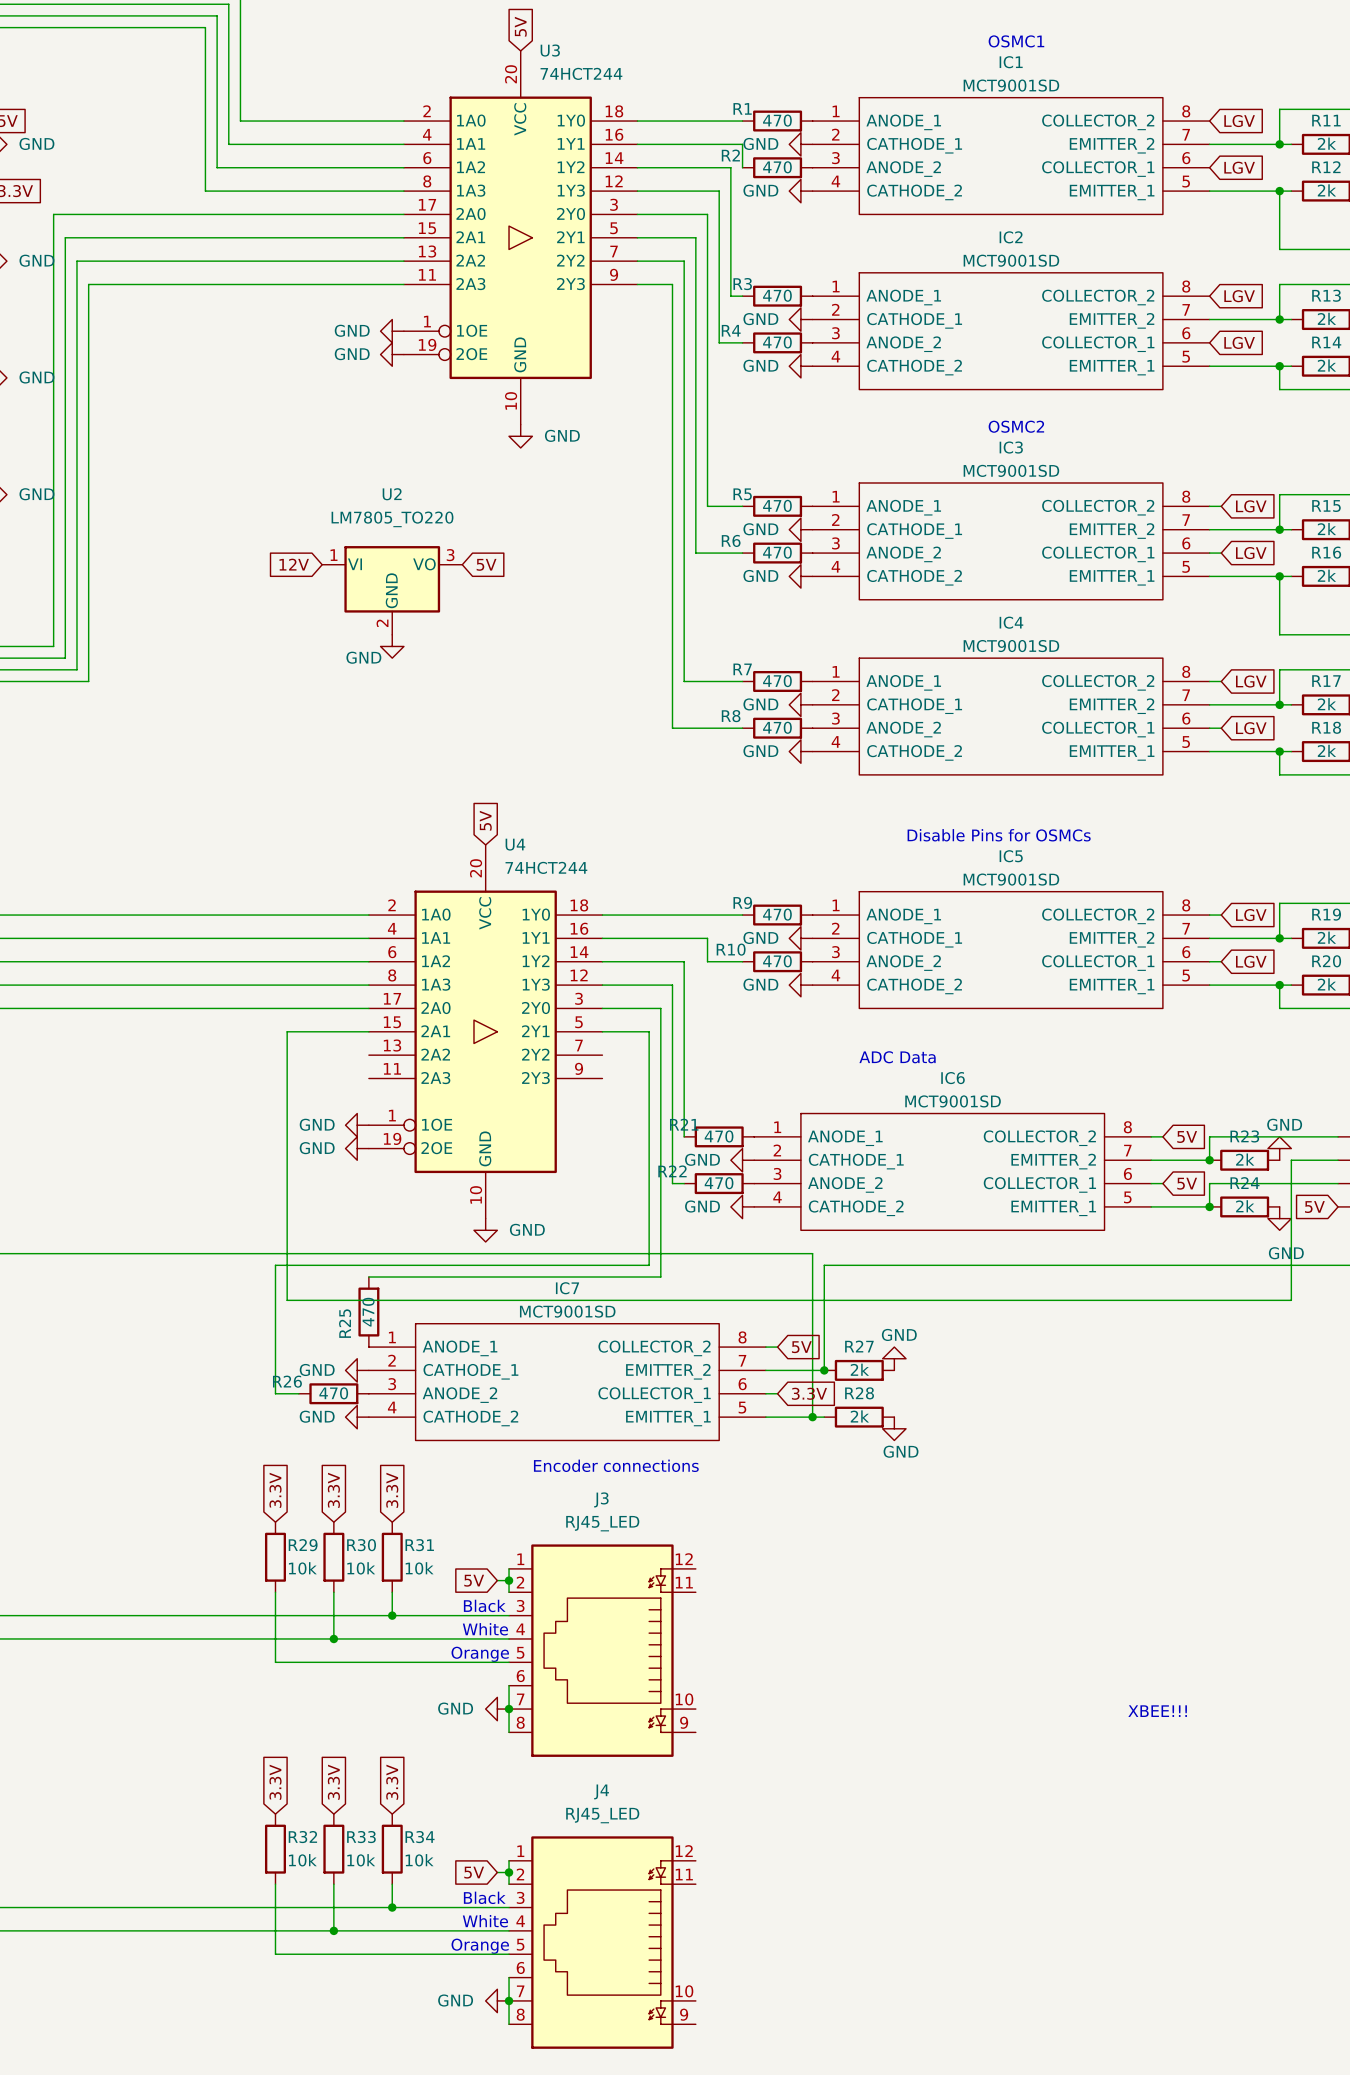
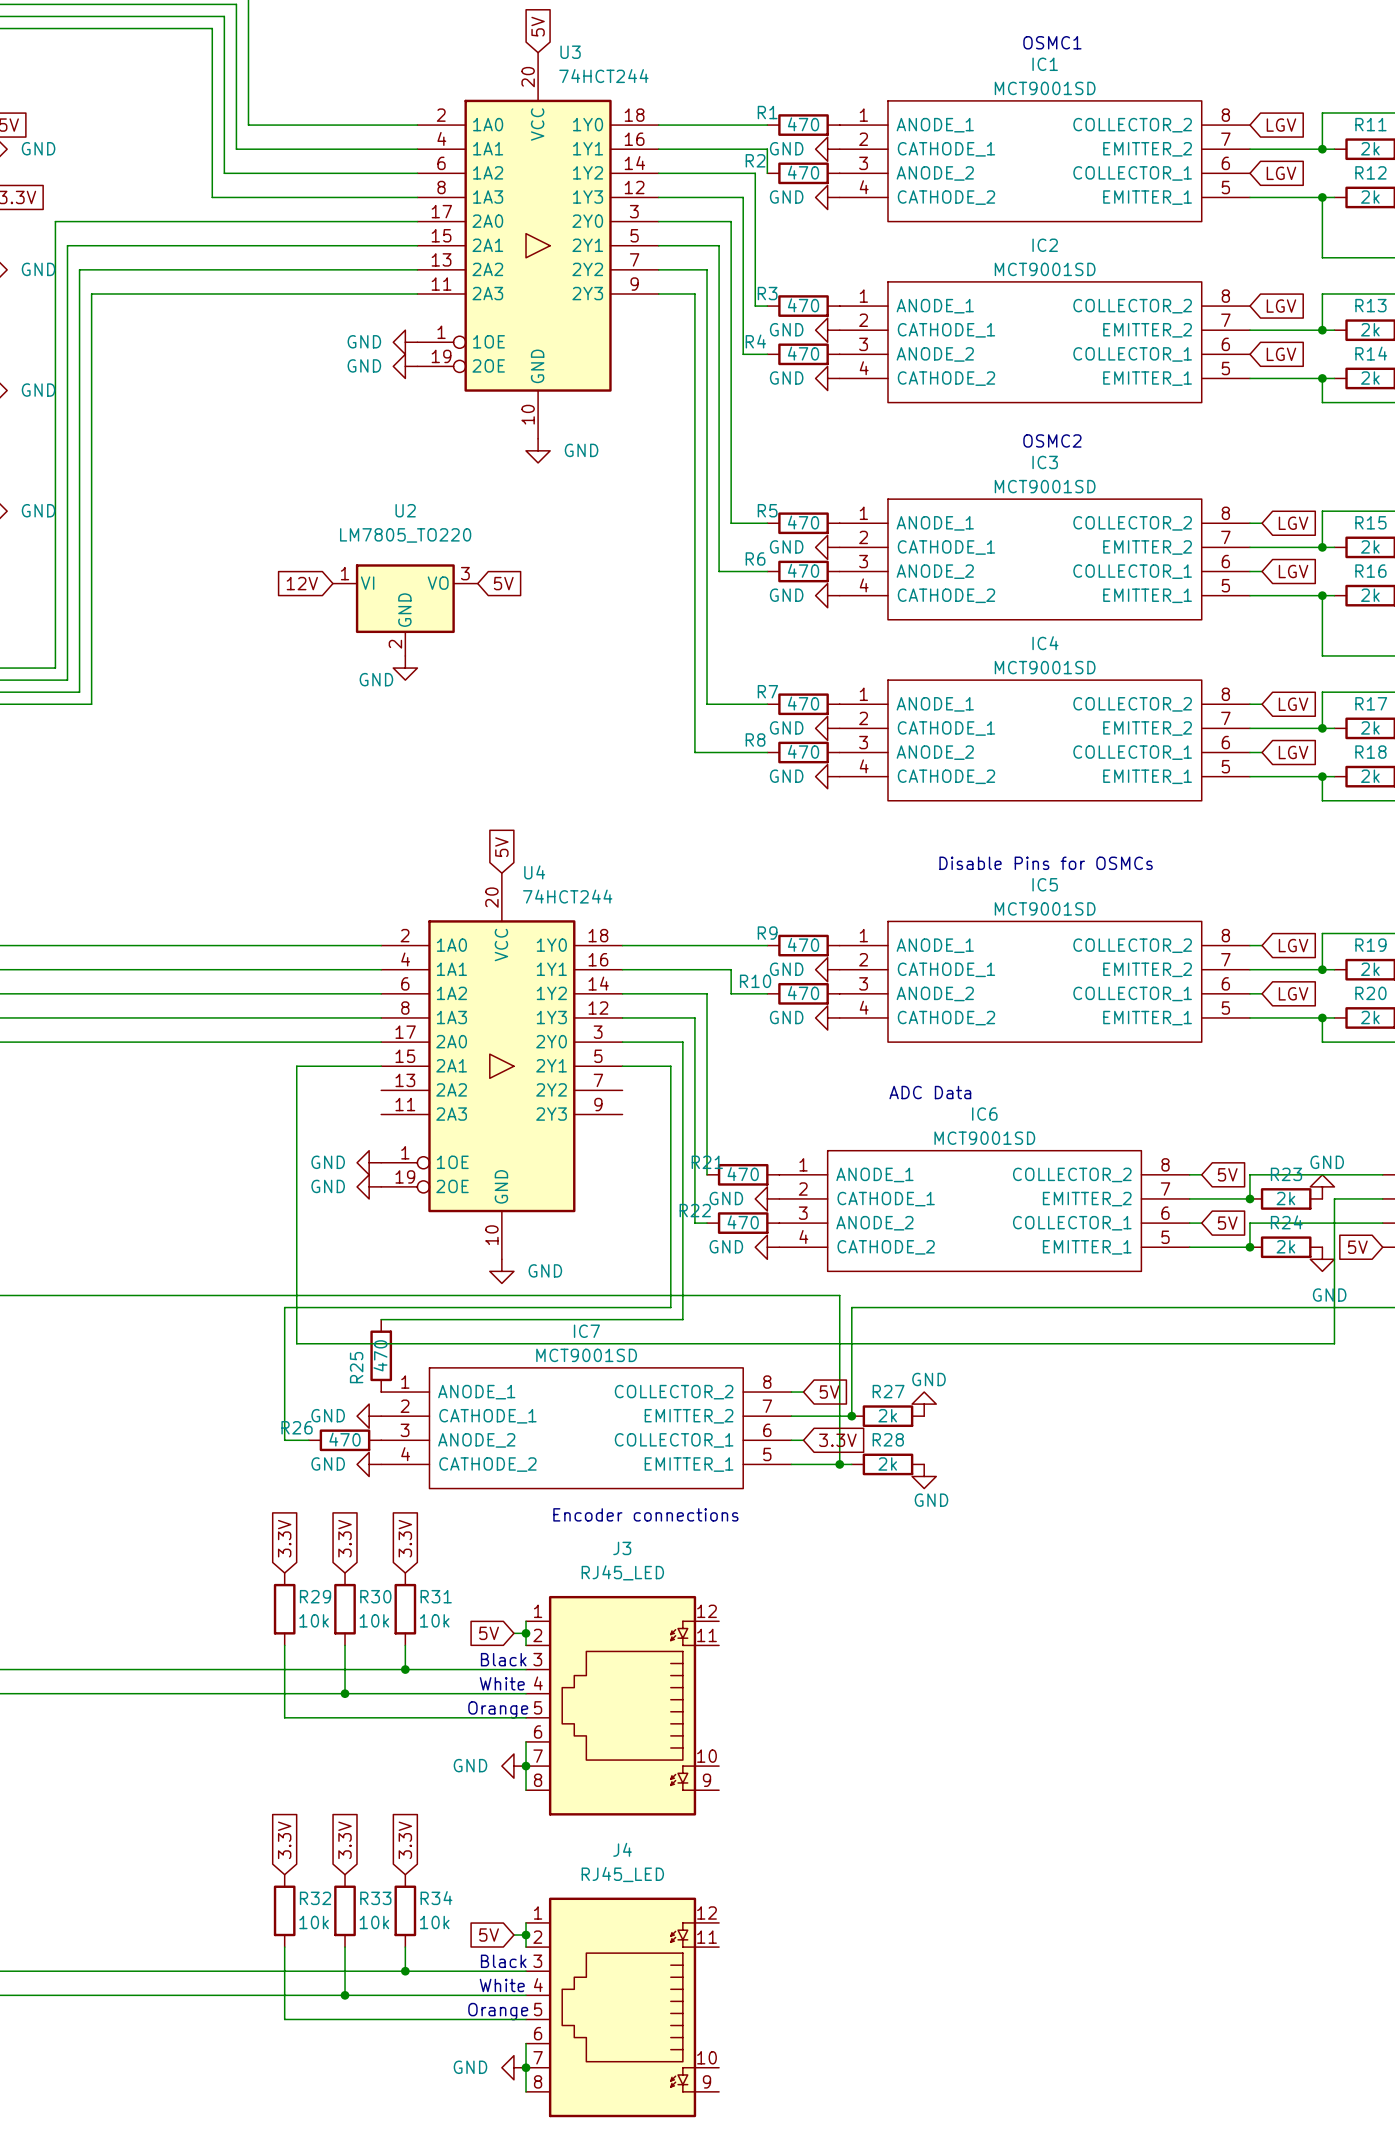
text: XBEE!!! (1157, 1711) -> none

